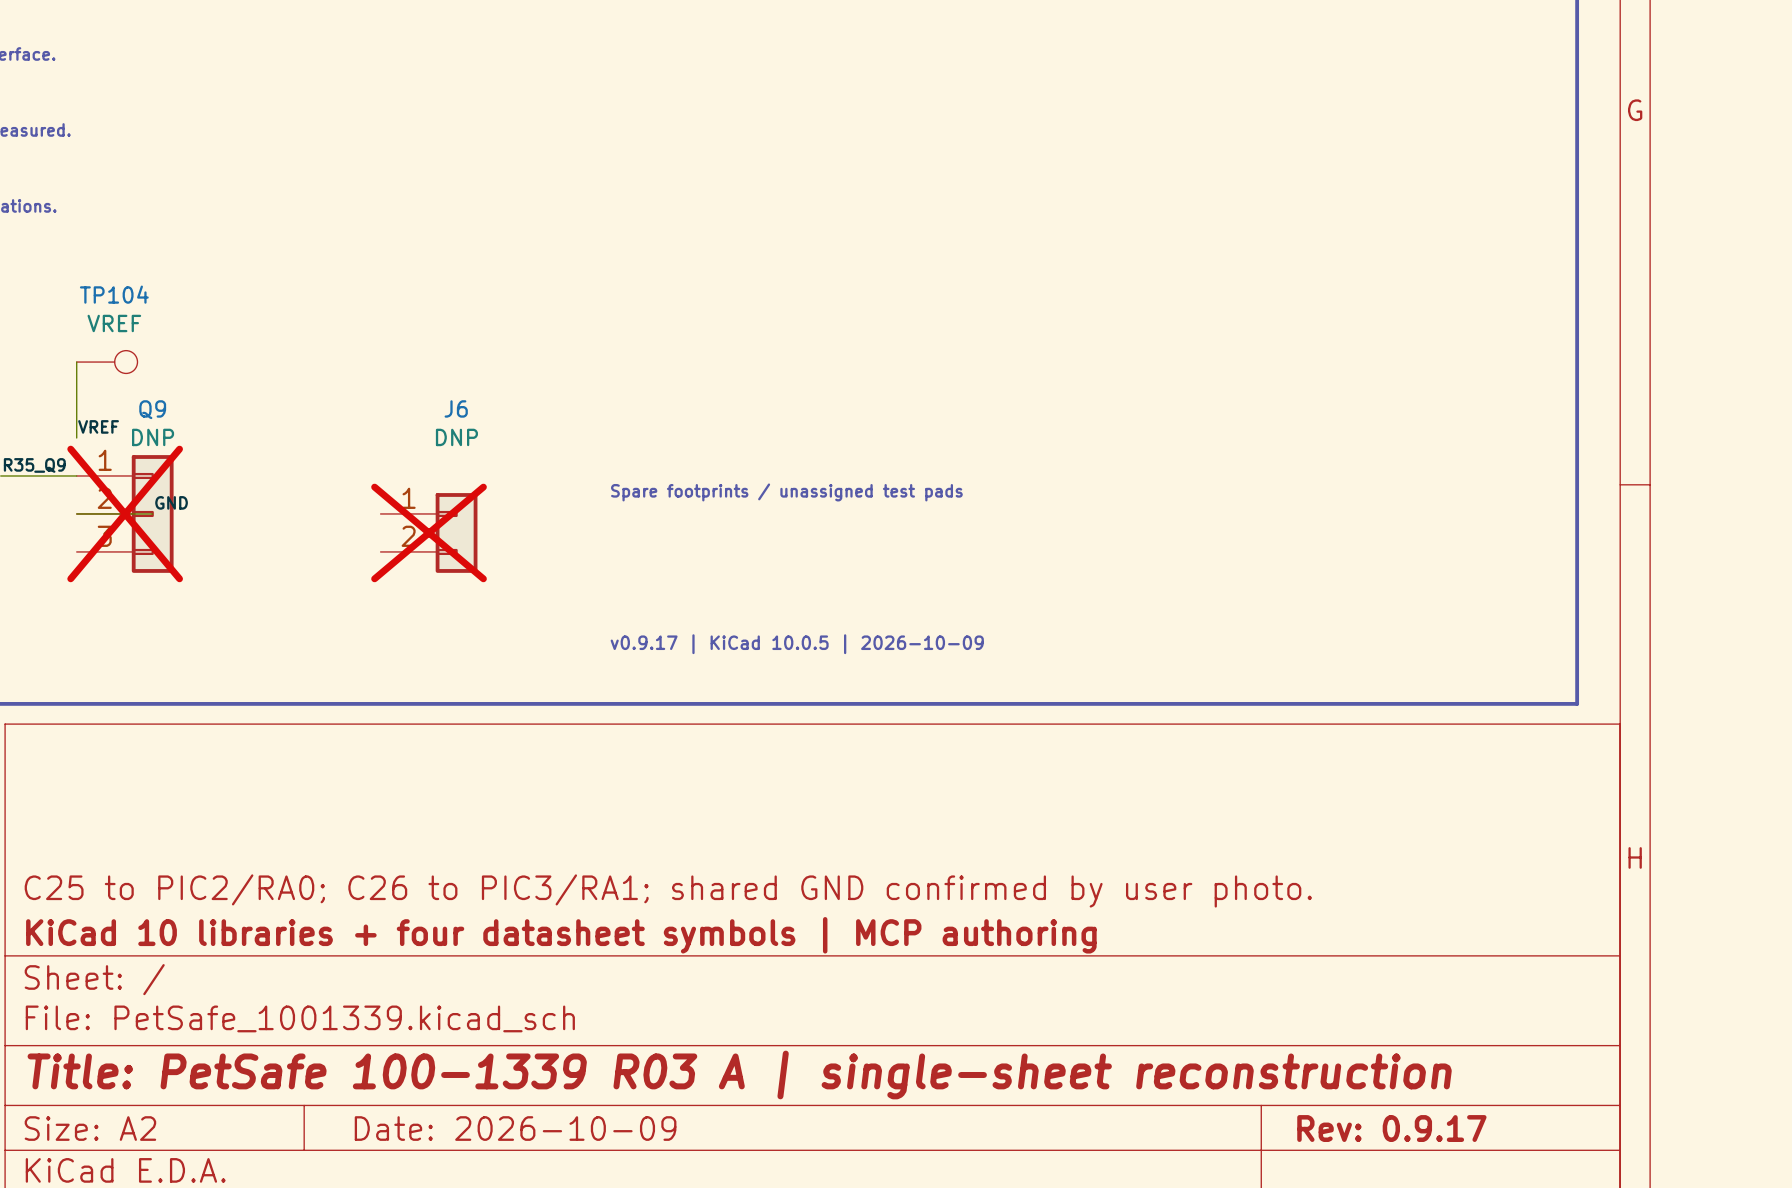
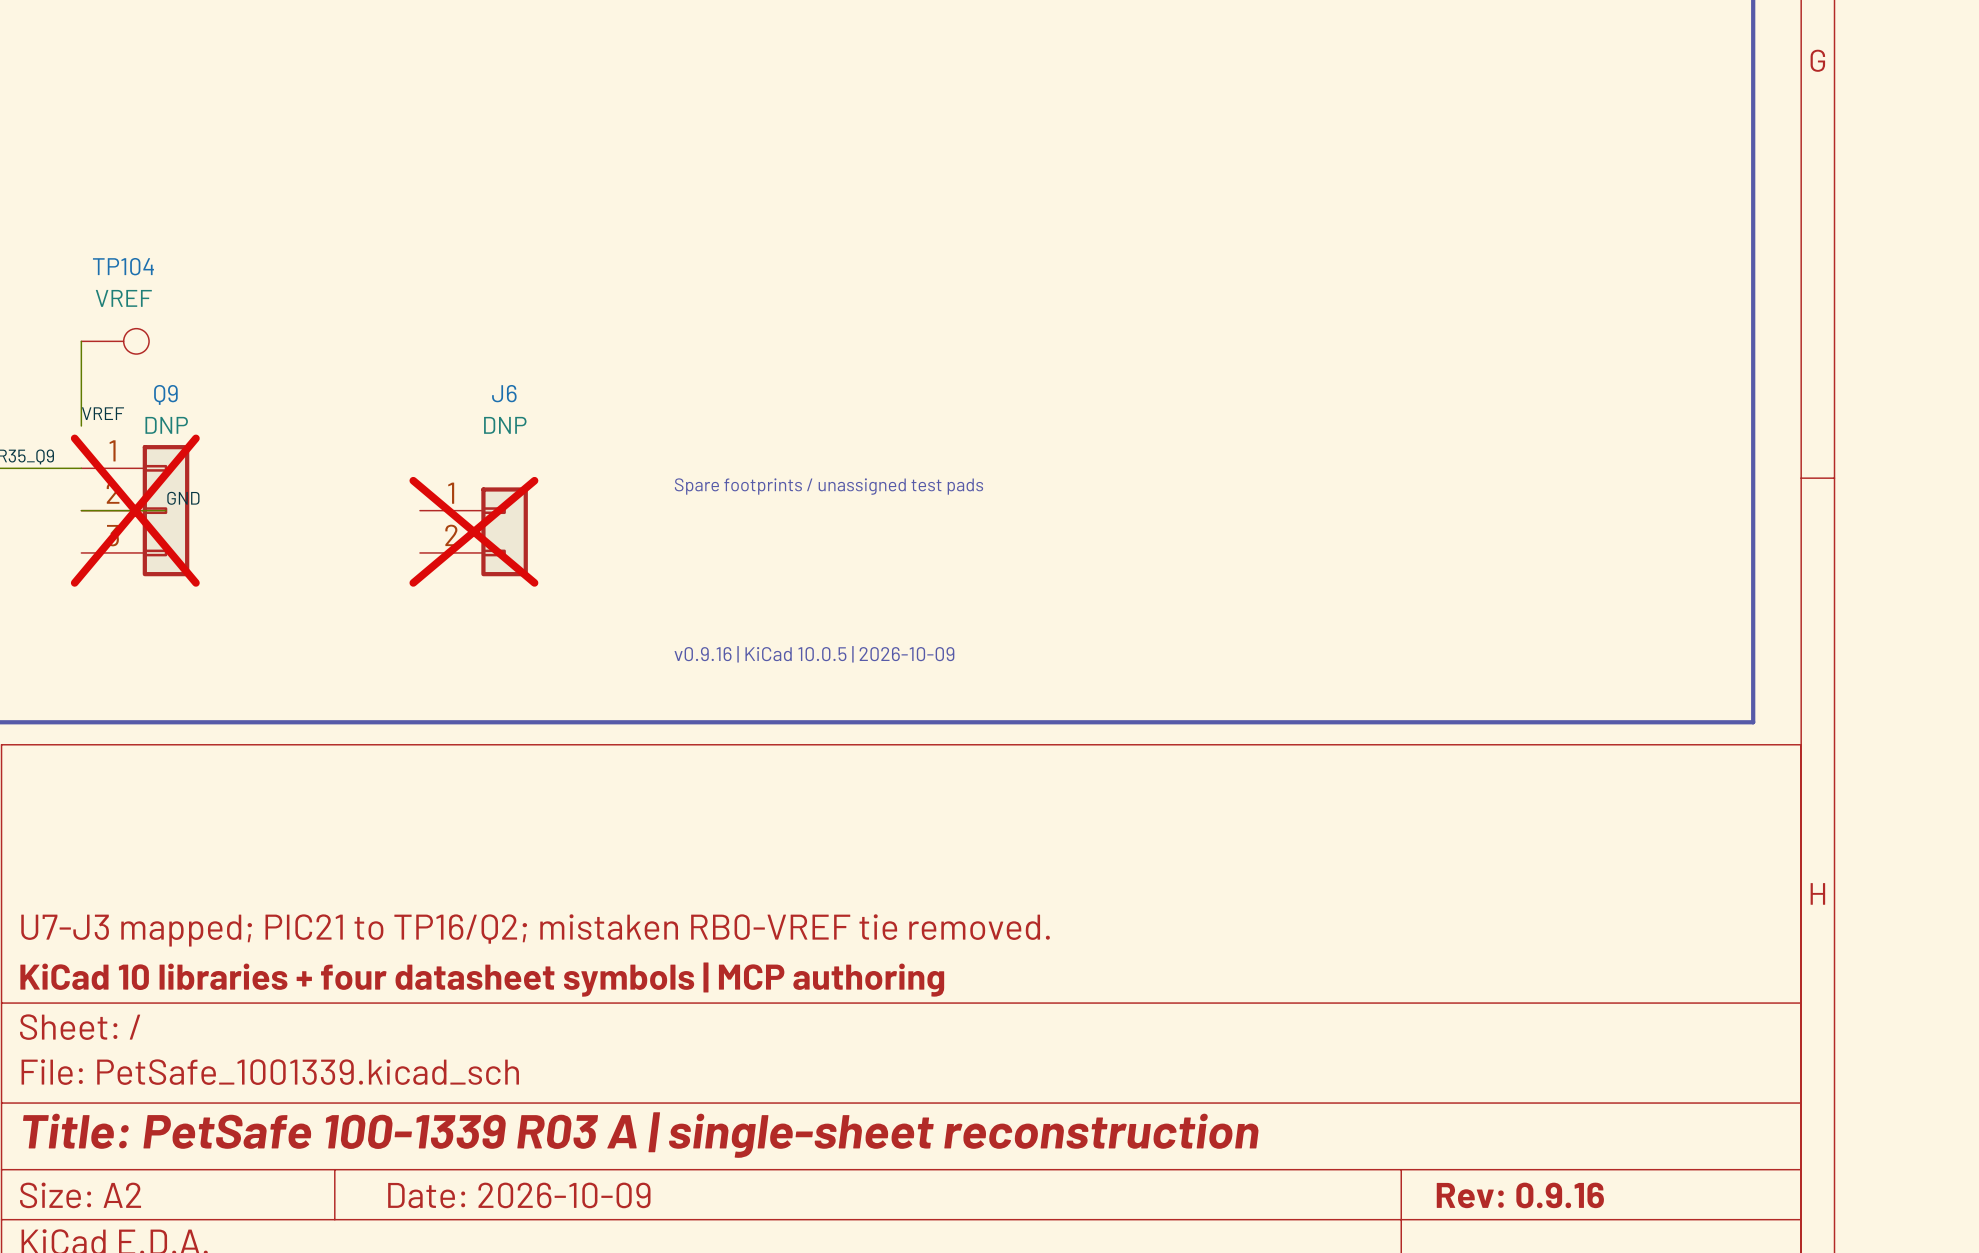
text: v0.9.17 | KiCad 10.0.5 | 2026-10-09 (797, 644) -> v0.9.16 | KiCad 10.0.5 | 2026-10-09 (814, 654)
title block: C25 to PIC2/RA0; C26 to PIC3/RA1; shared GND confirmed by user photo. (668, 890) -> U7-J3 mapped; PIC21 to TP16/Q2; mistaken RB0-VREF tie removed. (535, 930)
title block: Rev: 0.9.17 (1391, 1128) -> Rev: 0.9.16 (1520, 1195)

